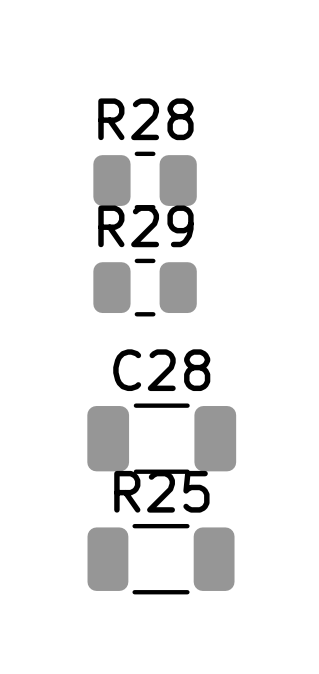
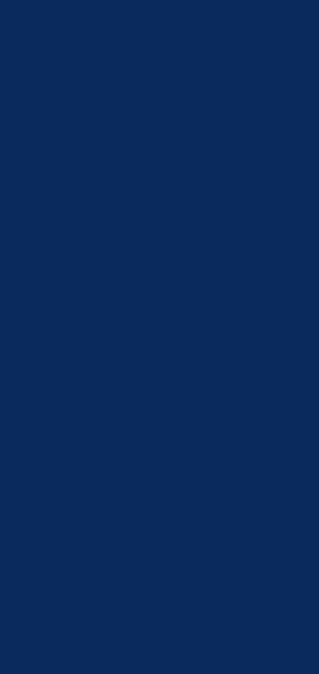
R28: (145, 180) -> none
R29: (145, 287) -> none
C28: (161, 438) -> none
R25: (161, 559) -> none

